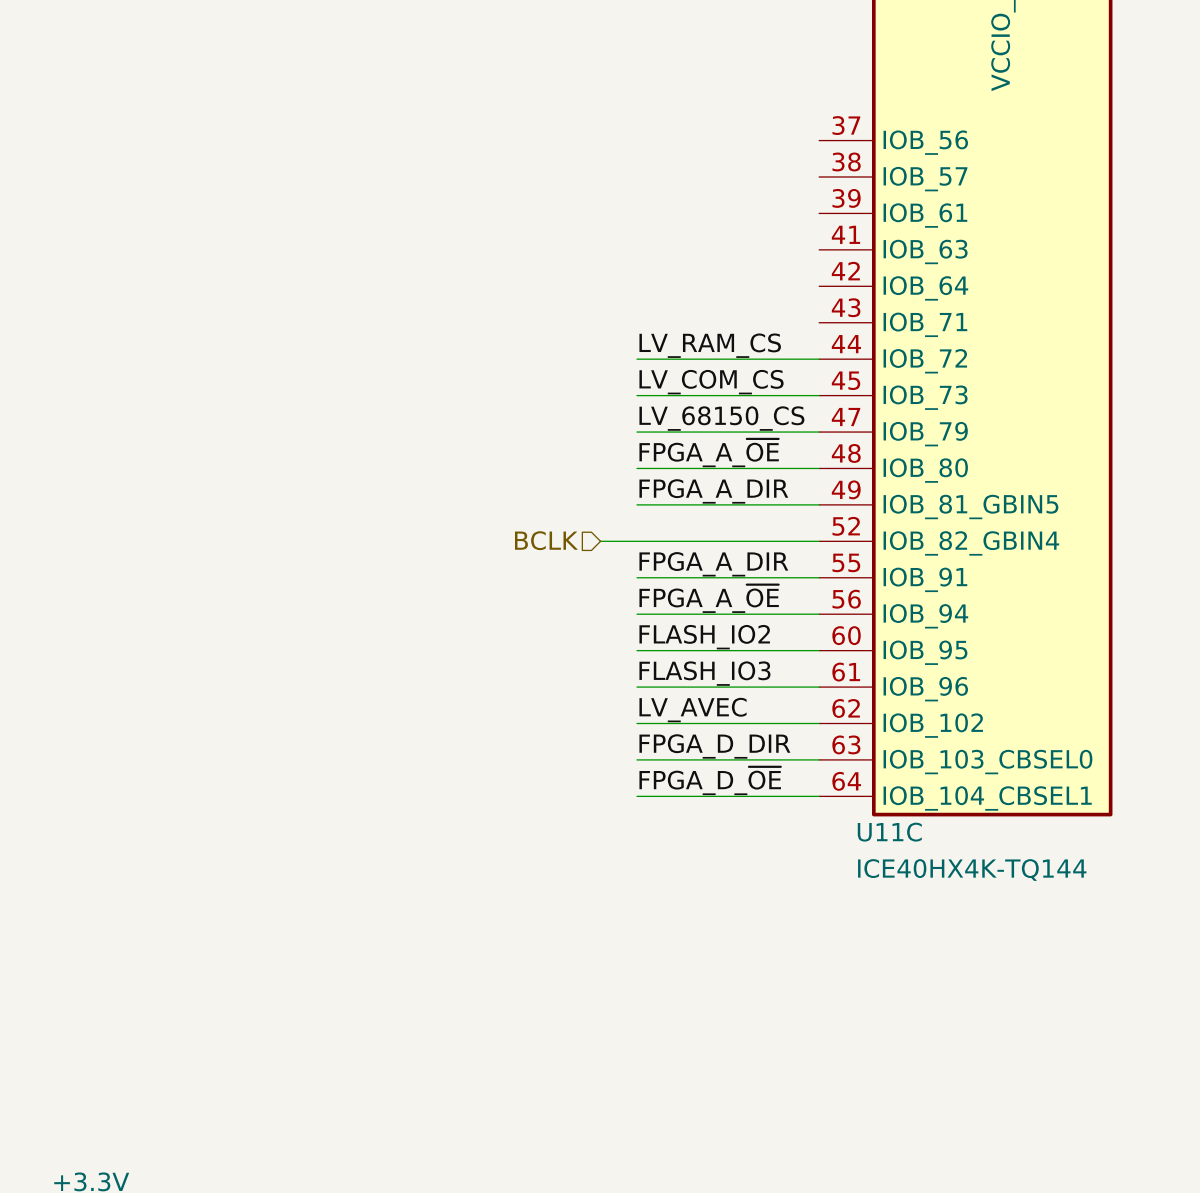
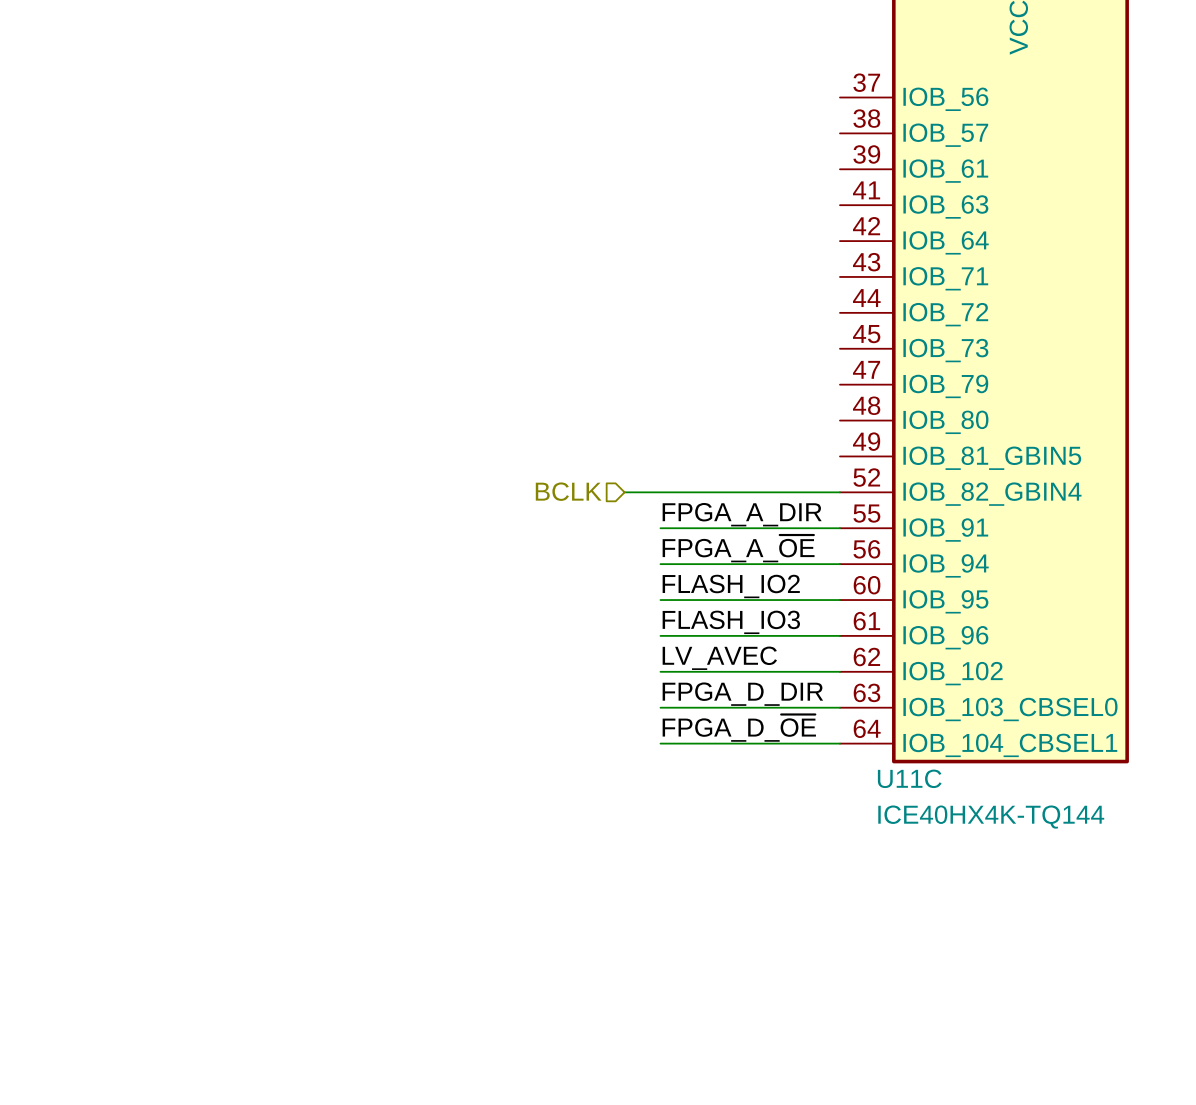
label: LV_RAM_CS (710, 345) -> none
wire: (637, 359) (819, 359) -> none
label: LV_COM_CS (711, 382) -> none
wire: (637, 395) (819, 395) -> none
label: LV_68150_CS (721, 418) -> none
wire: (637, 432) (819, 432) -> none
label: FPGA_A_~{OE} (709, 453) -> none
wire: (637, 468) (819, 468) -> none
label: FPGA_A_DIR (713, 491) -> none
wire: (637, 504) (819, 504) -> none

